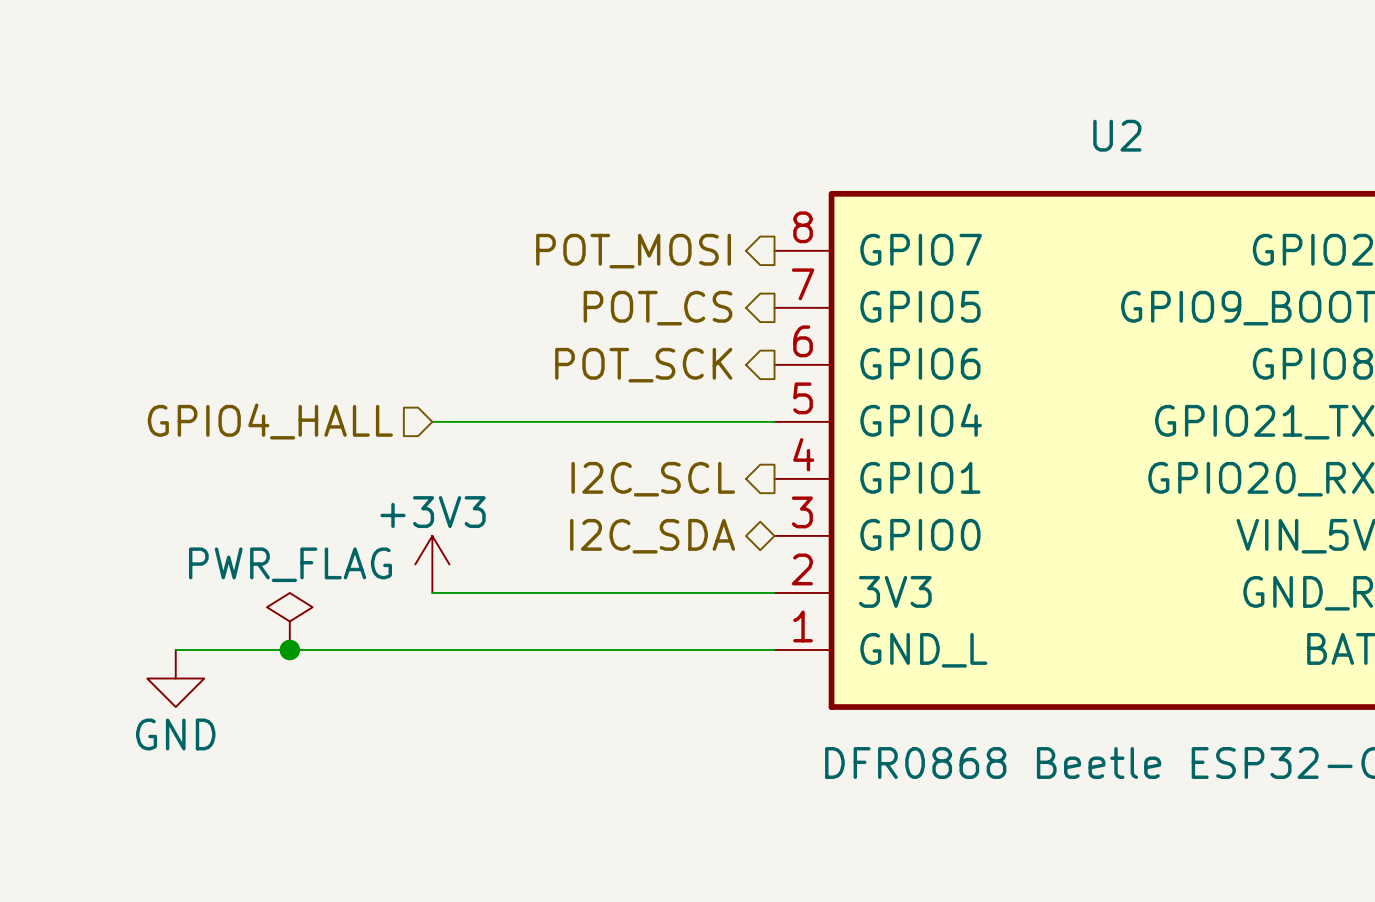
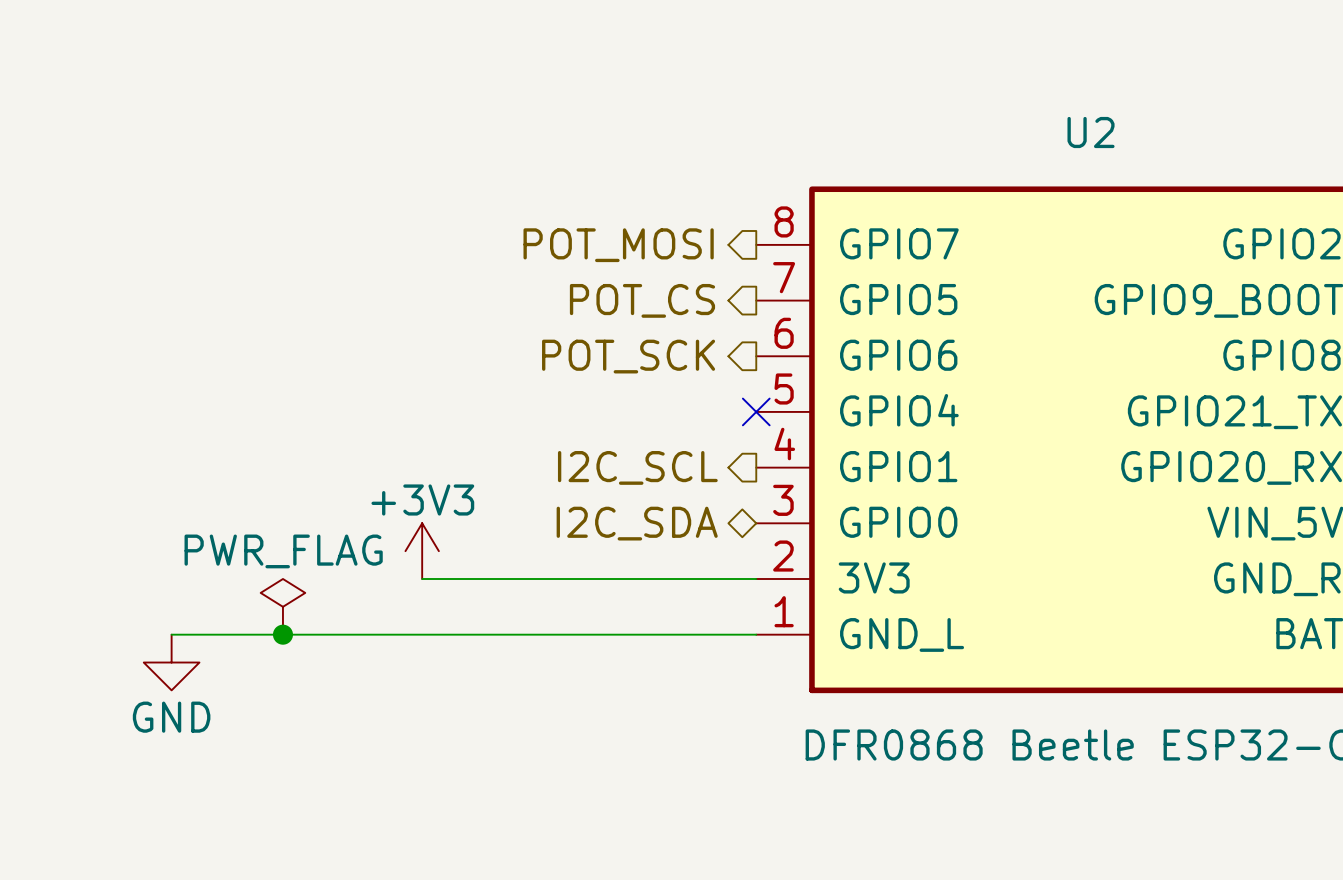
hierarchical label: GPIO4_HALL (270, 421) -> none
wire: (432, 421) (774, 421) -> none
no-connect mark: none -> (756, 411)

